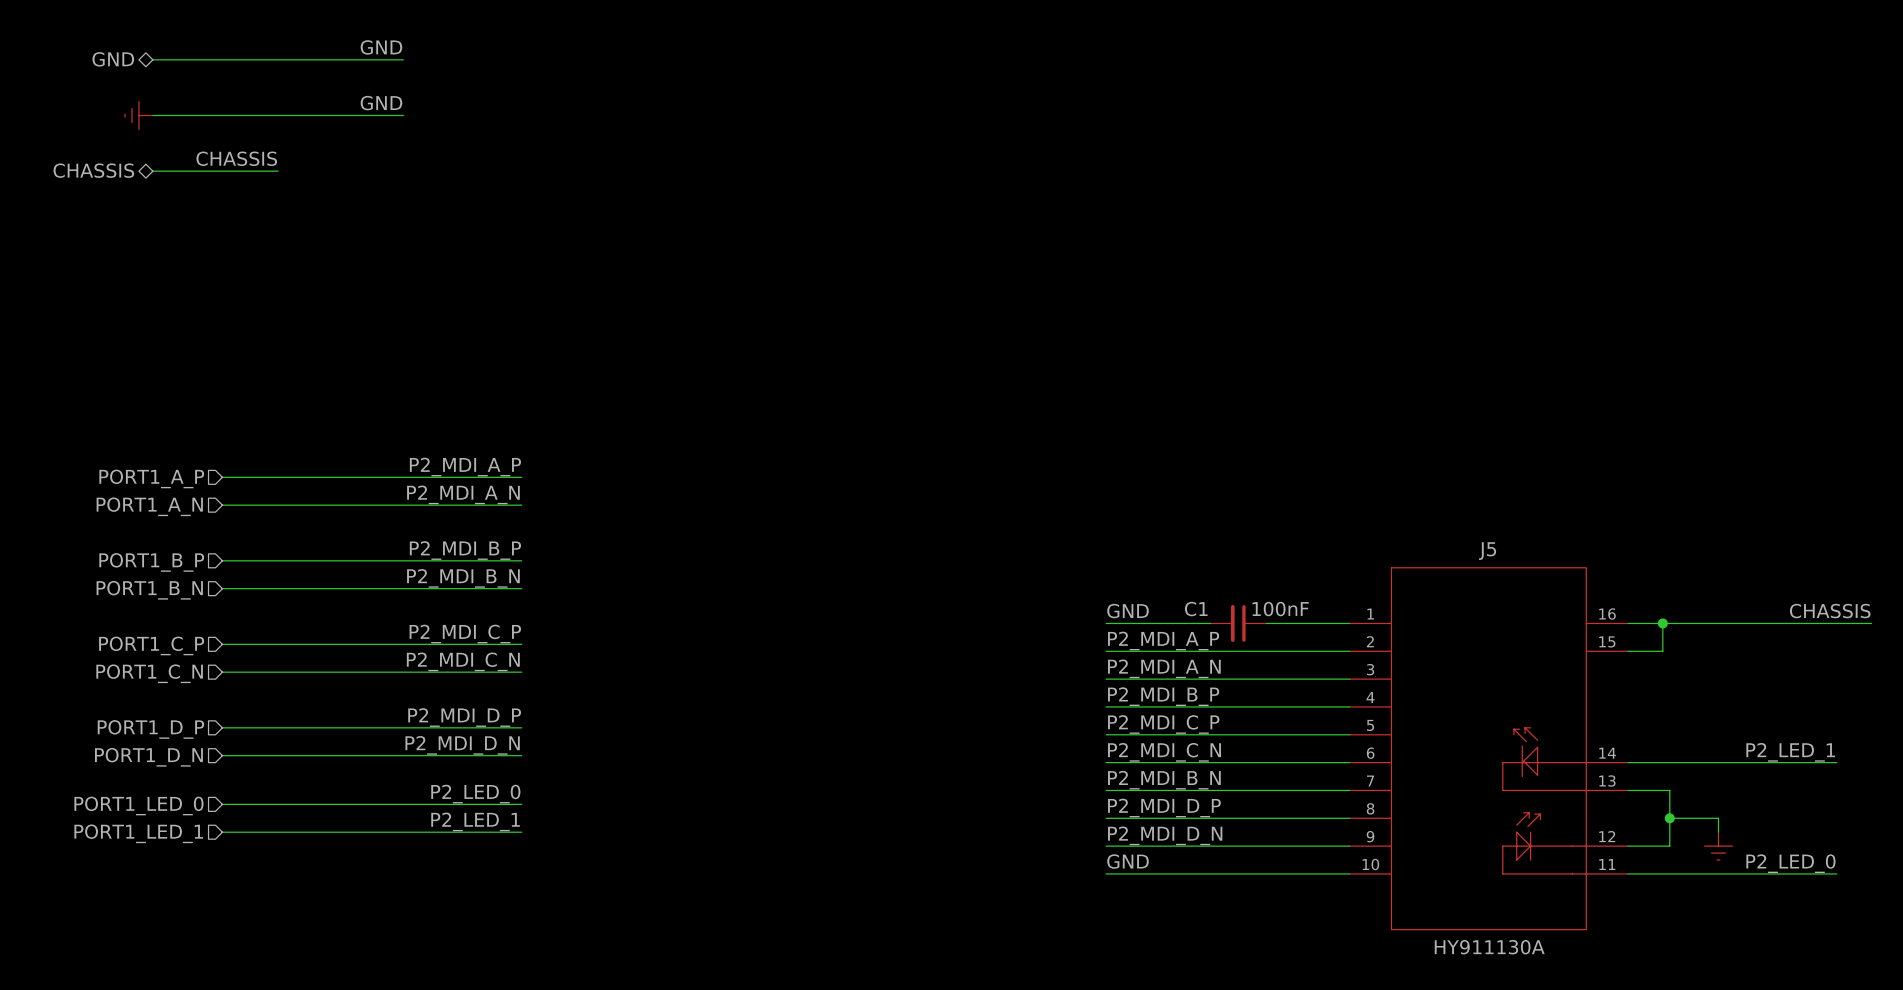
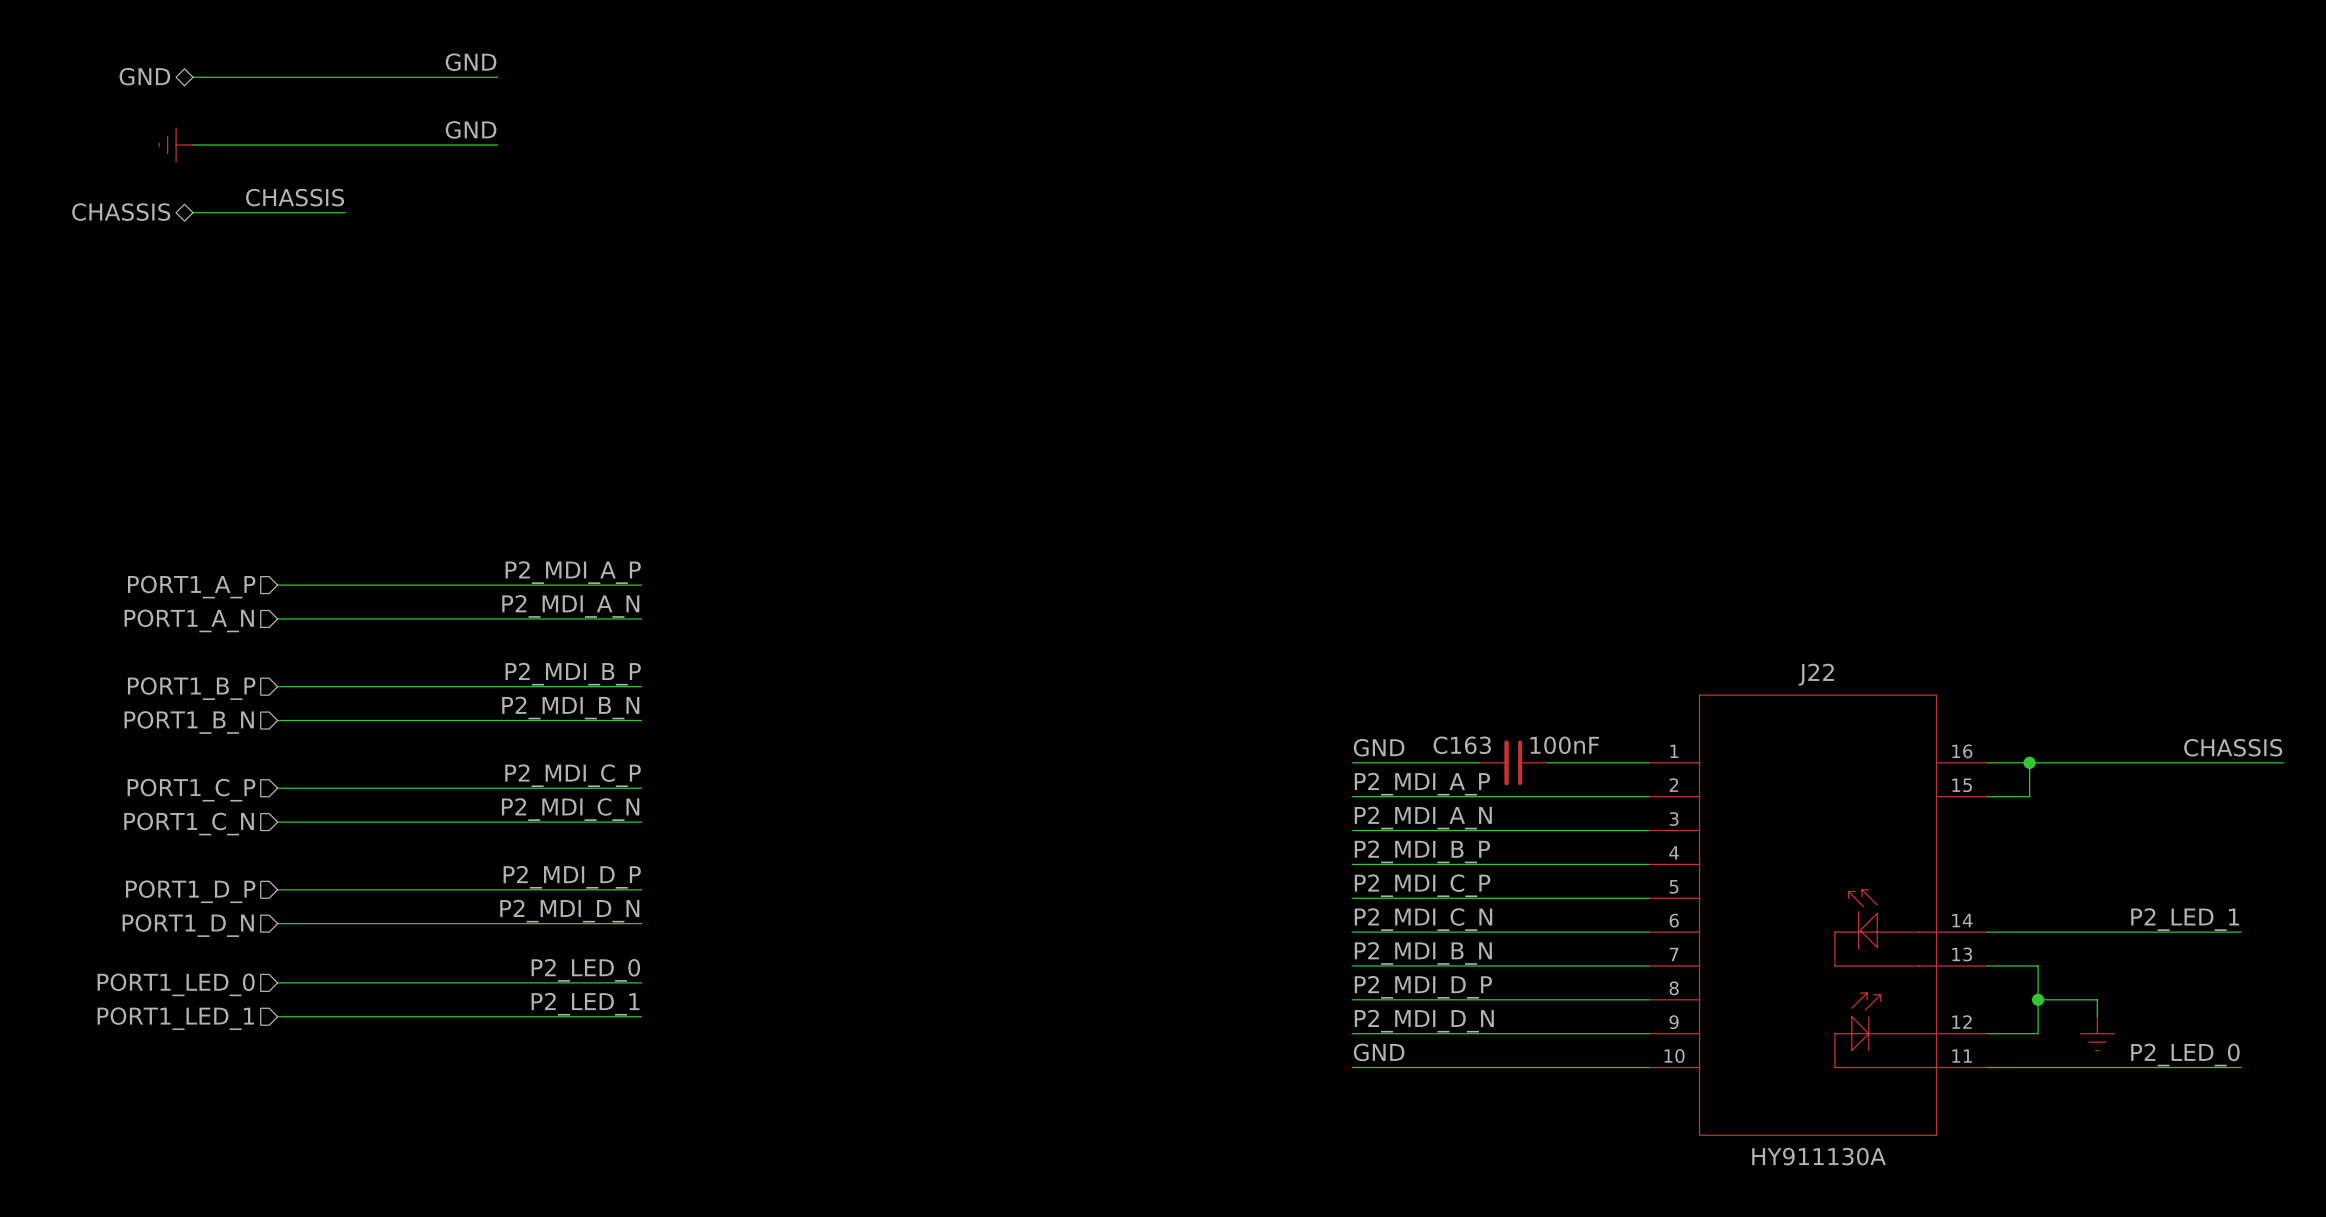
J5 name: J5 (1487, 551) -> J22 (1816, 674)
C1 name: C1 (1196, 609) -> C163 (1462, 745)

